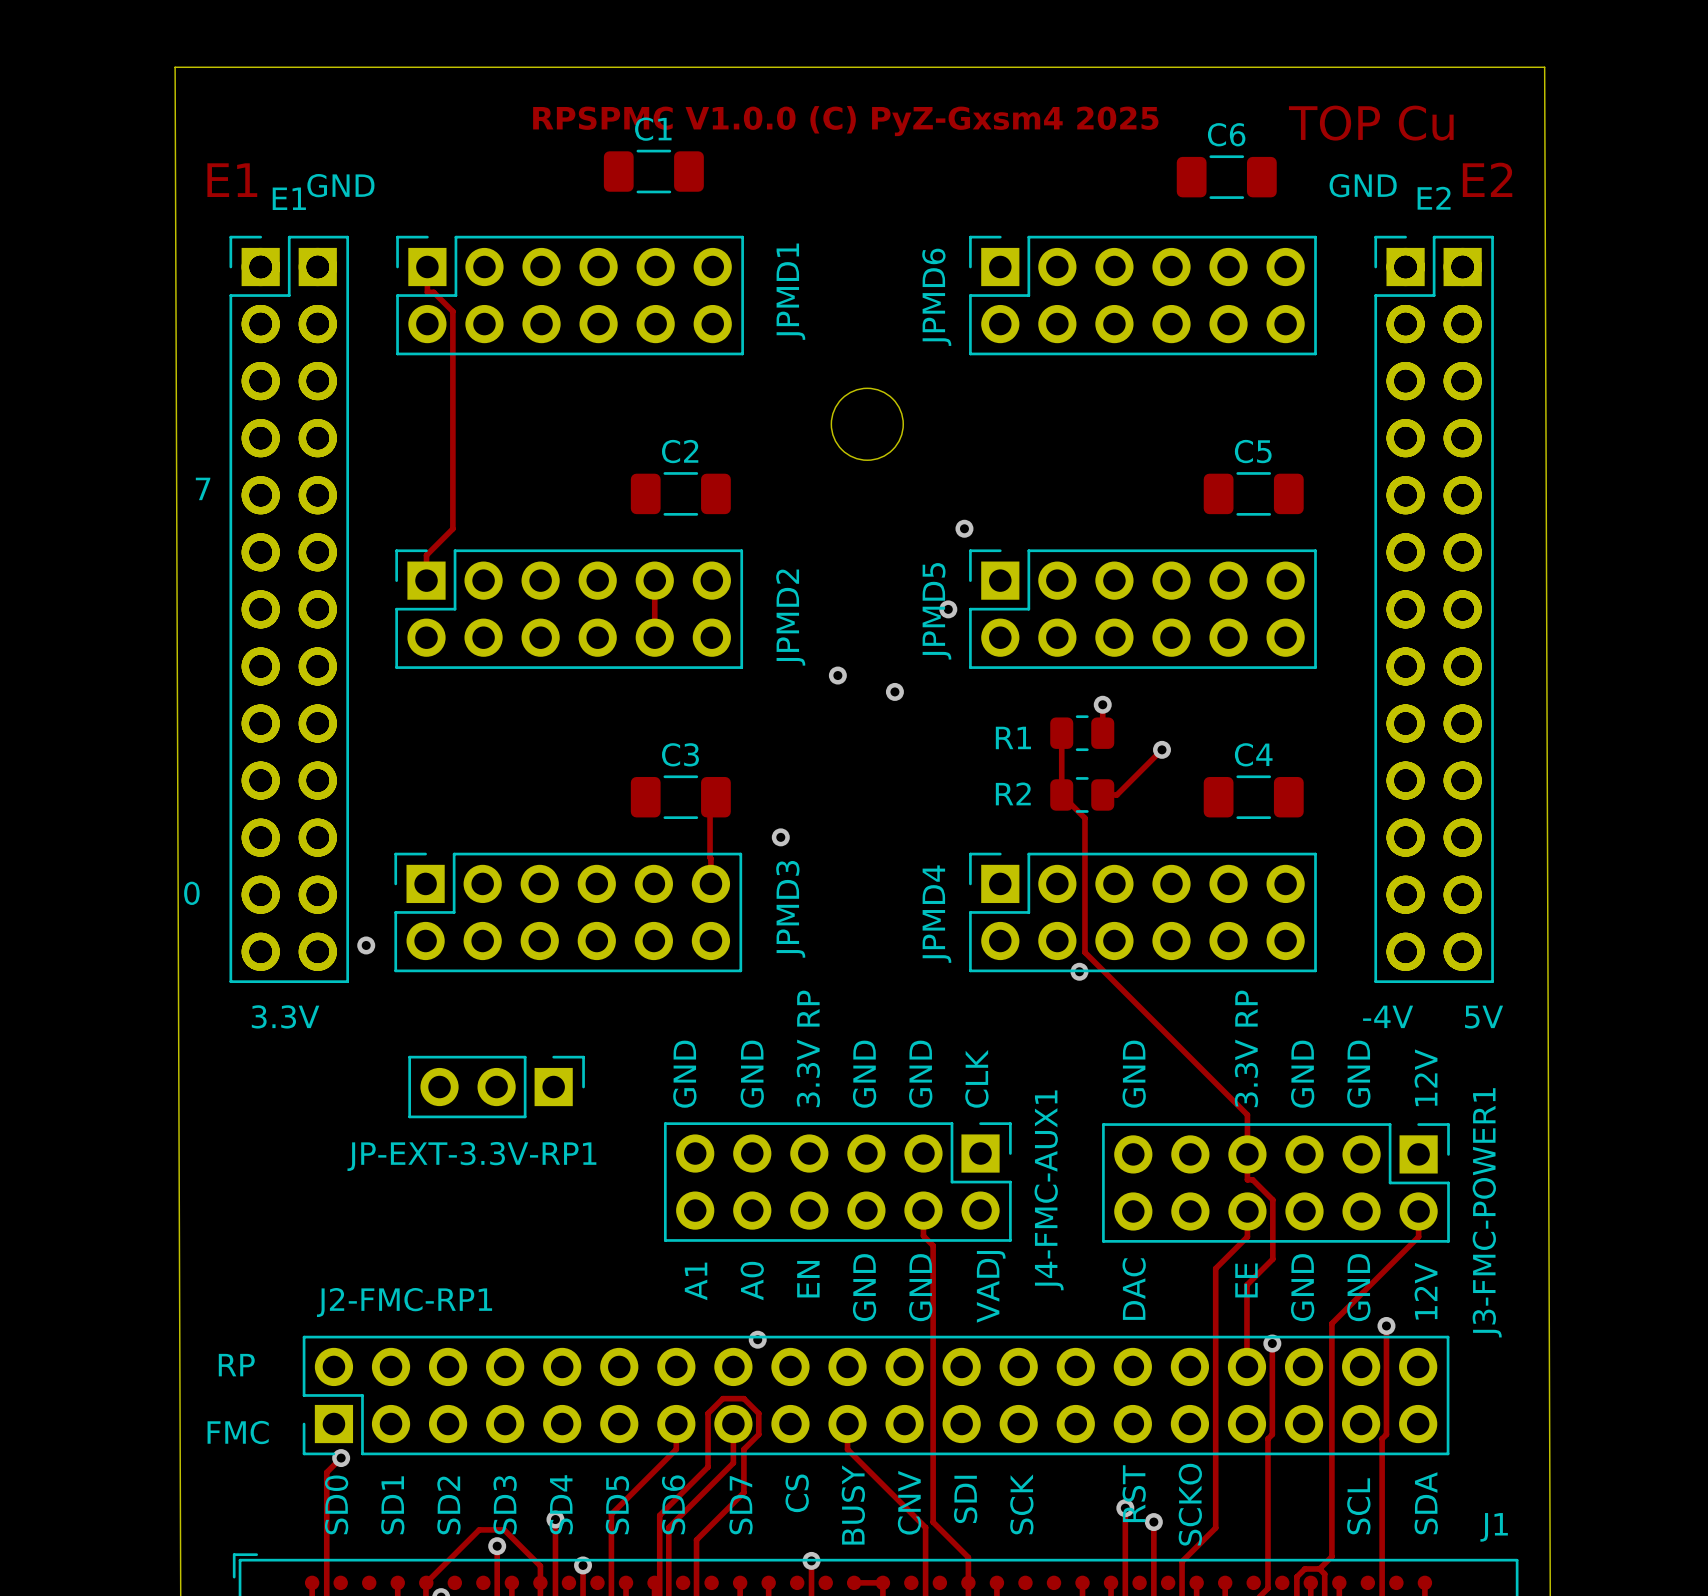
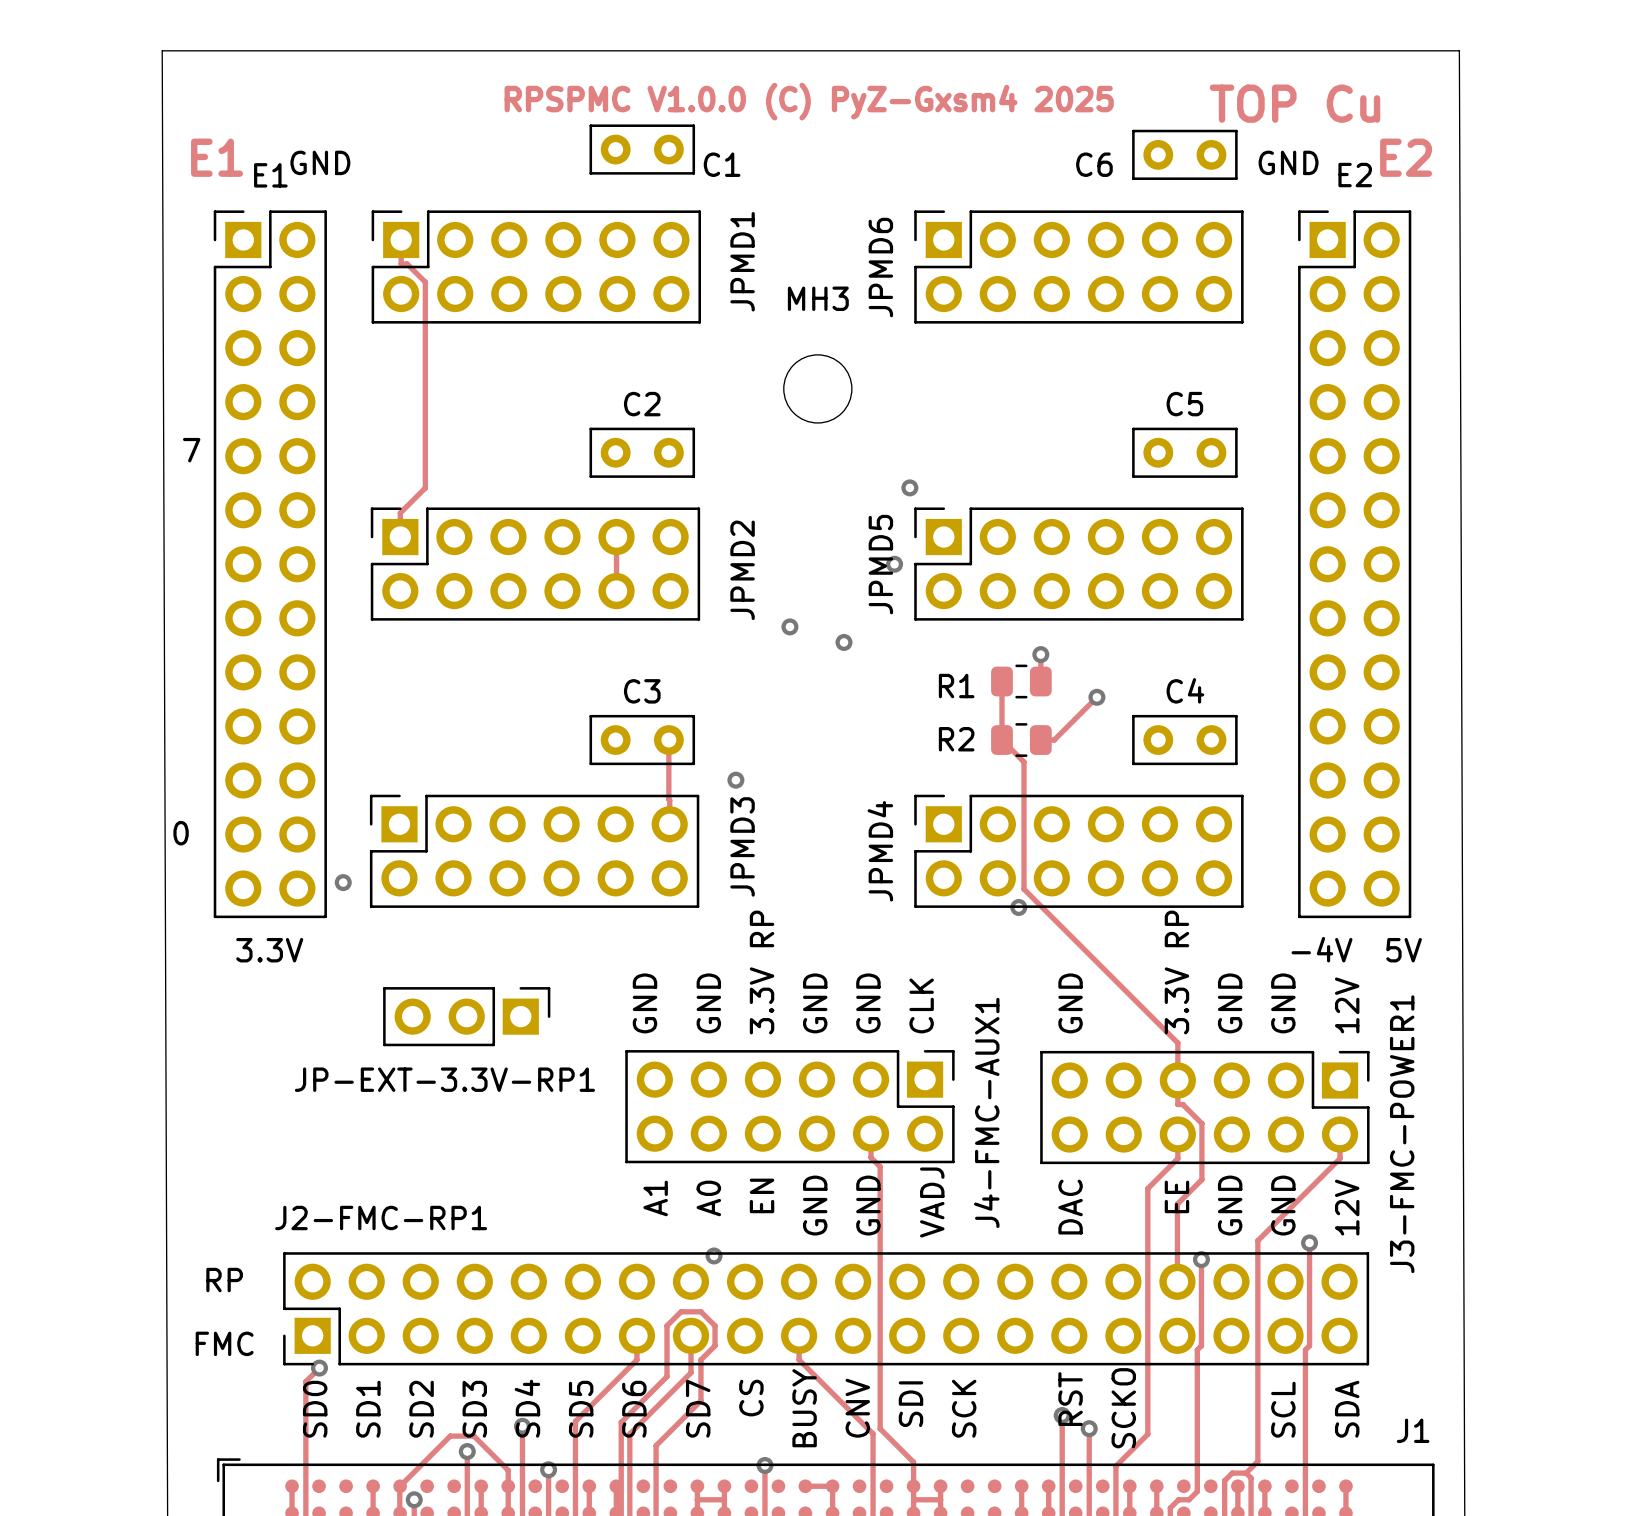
C1 name position: C1 (653, 129) -> C1 (722, 164)
C6 name position: C6 (1226, 134) -> C6 (1094, 164)
C1 footprint: [603, 149, 704, 194] -> [589, 124, 696, 175]
C6 footprint: [1176, 155, 1277, 199] -> [1132, 129, 1238, 180]
MH3 name: none -> MH3 (818, 298)
C2 footprint: [630, 472, 731, 516] -> [589, 427, 696, 478]
C5 footprint: [1203, 472, 1304, 516] -> [1132, 427, 1238, 478]
part: (289, 609) -> none
part: (1434, 609) -> none
C3 footprint: [630, 775, 731, 820] -> [589, 714, 696, 766]
C4 footprint: [1203, 775, 1304, 820] -> [1132, 714, 1238, 766]

